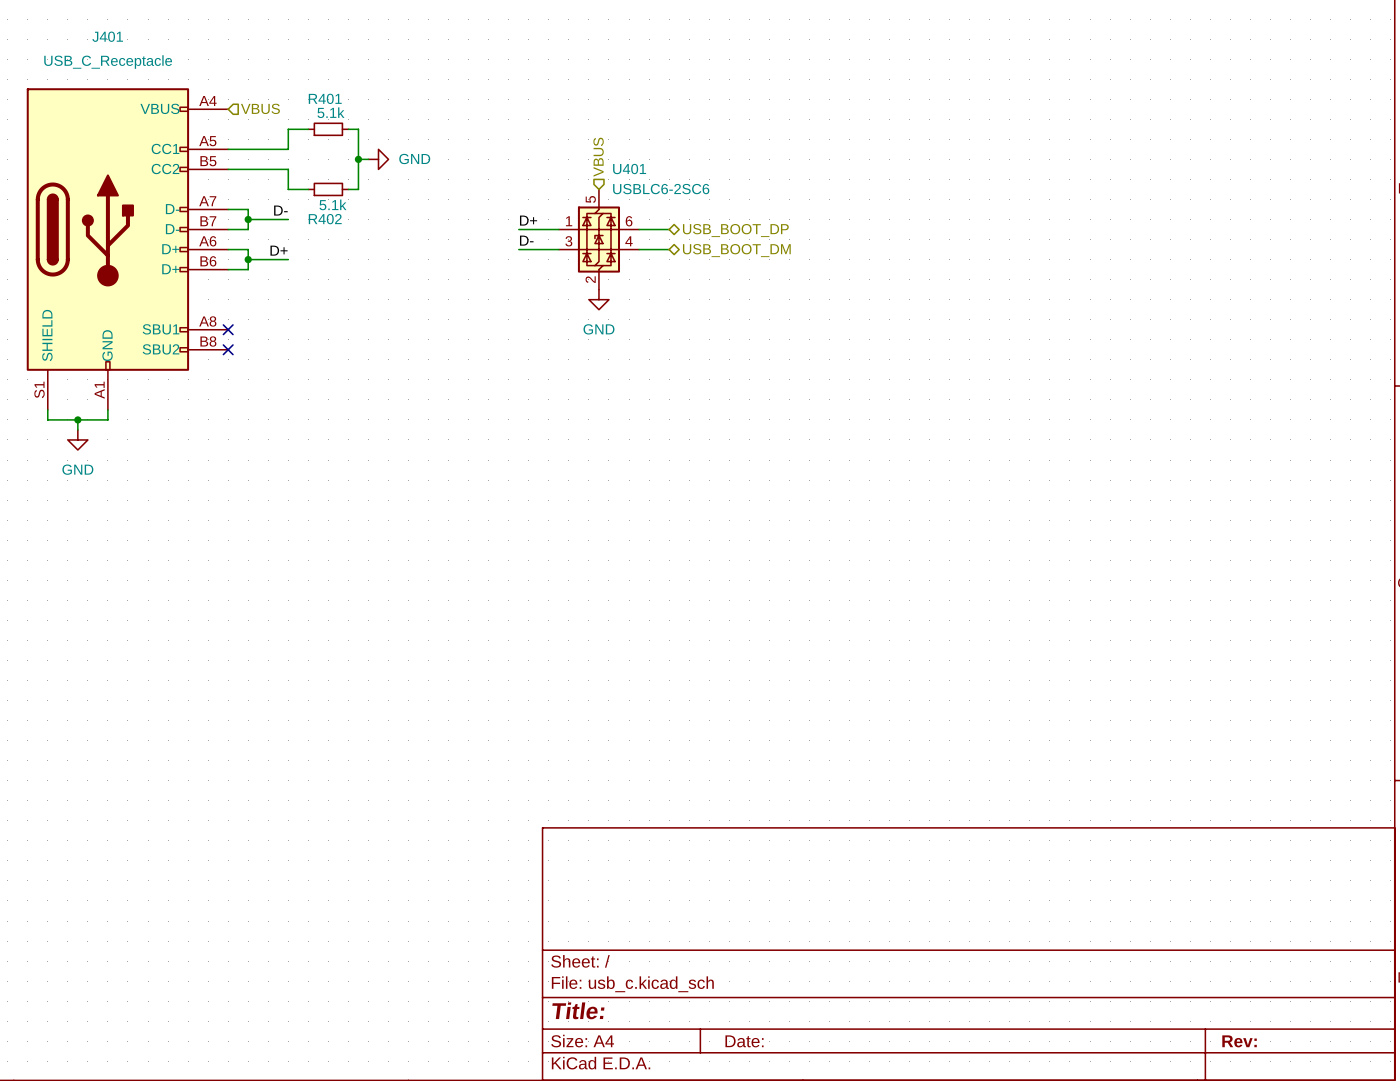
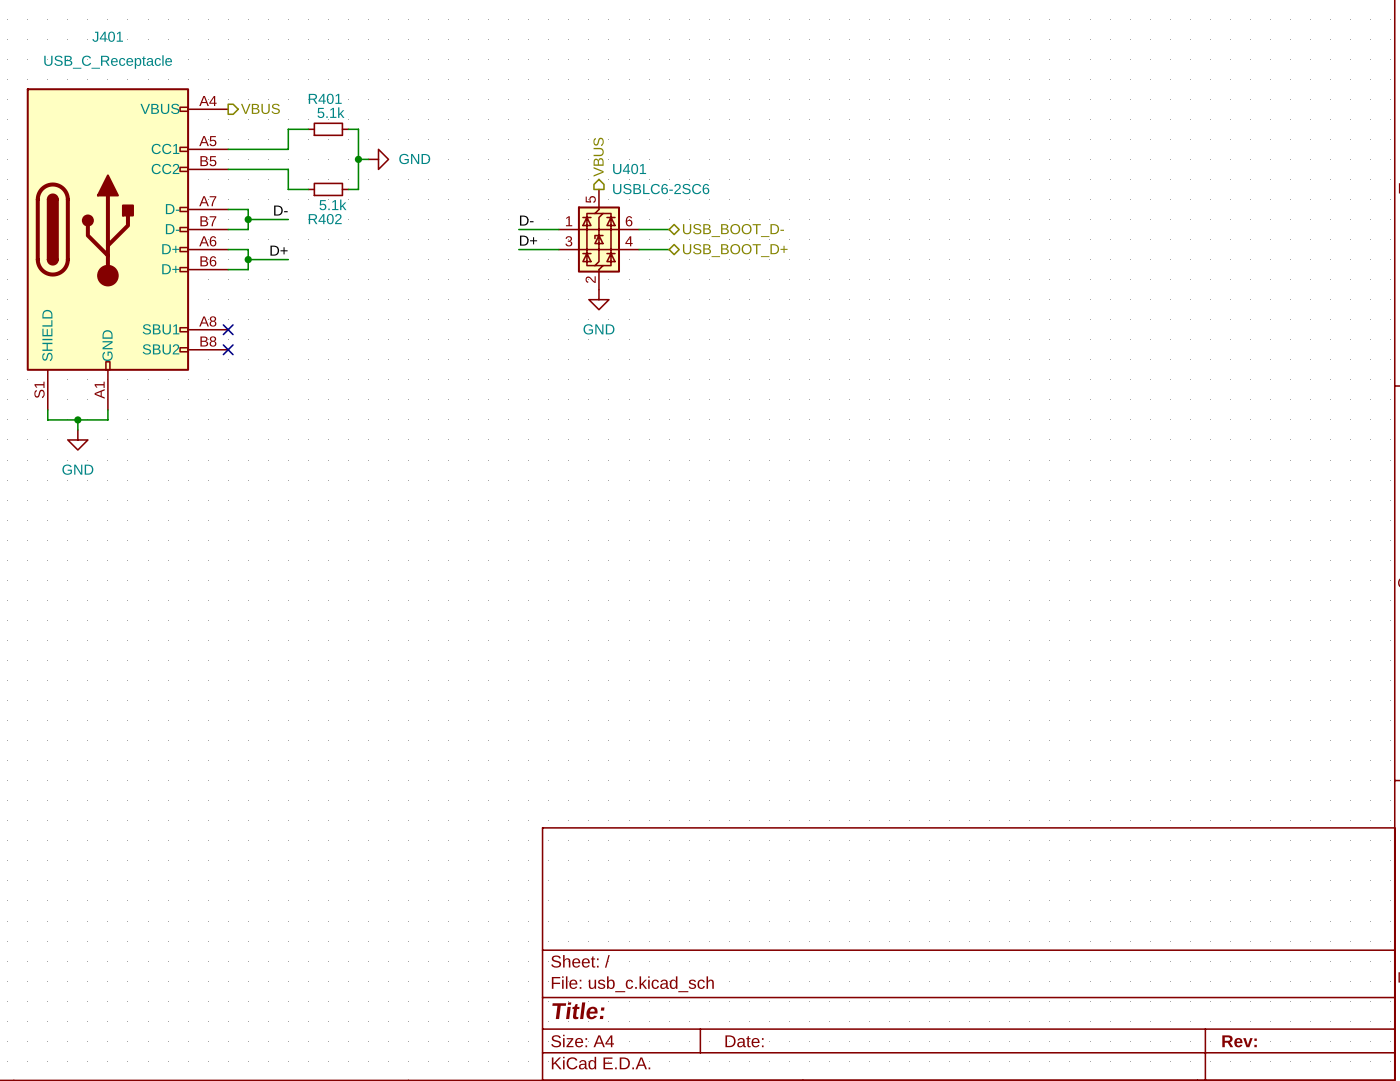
hierarchical label shape: input (260, 108) -> output (260, 108)
hierarchical label shape: input (598, 157) -> output (598, 157)
label: D+ (528, 220) -> D- (526, 220)
hierarchical label: USB_BOOT_DP (735, 230) -> USB_BOOT_D- (733, 230)
label: D- (526, 240) -> D+ (528, 240)
hierarchical label: USB_BOOT_DM (736, 250) -> USB_BOOT_D+ (735, 250)

